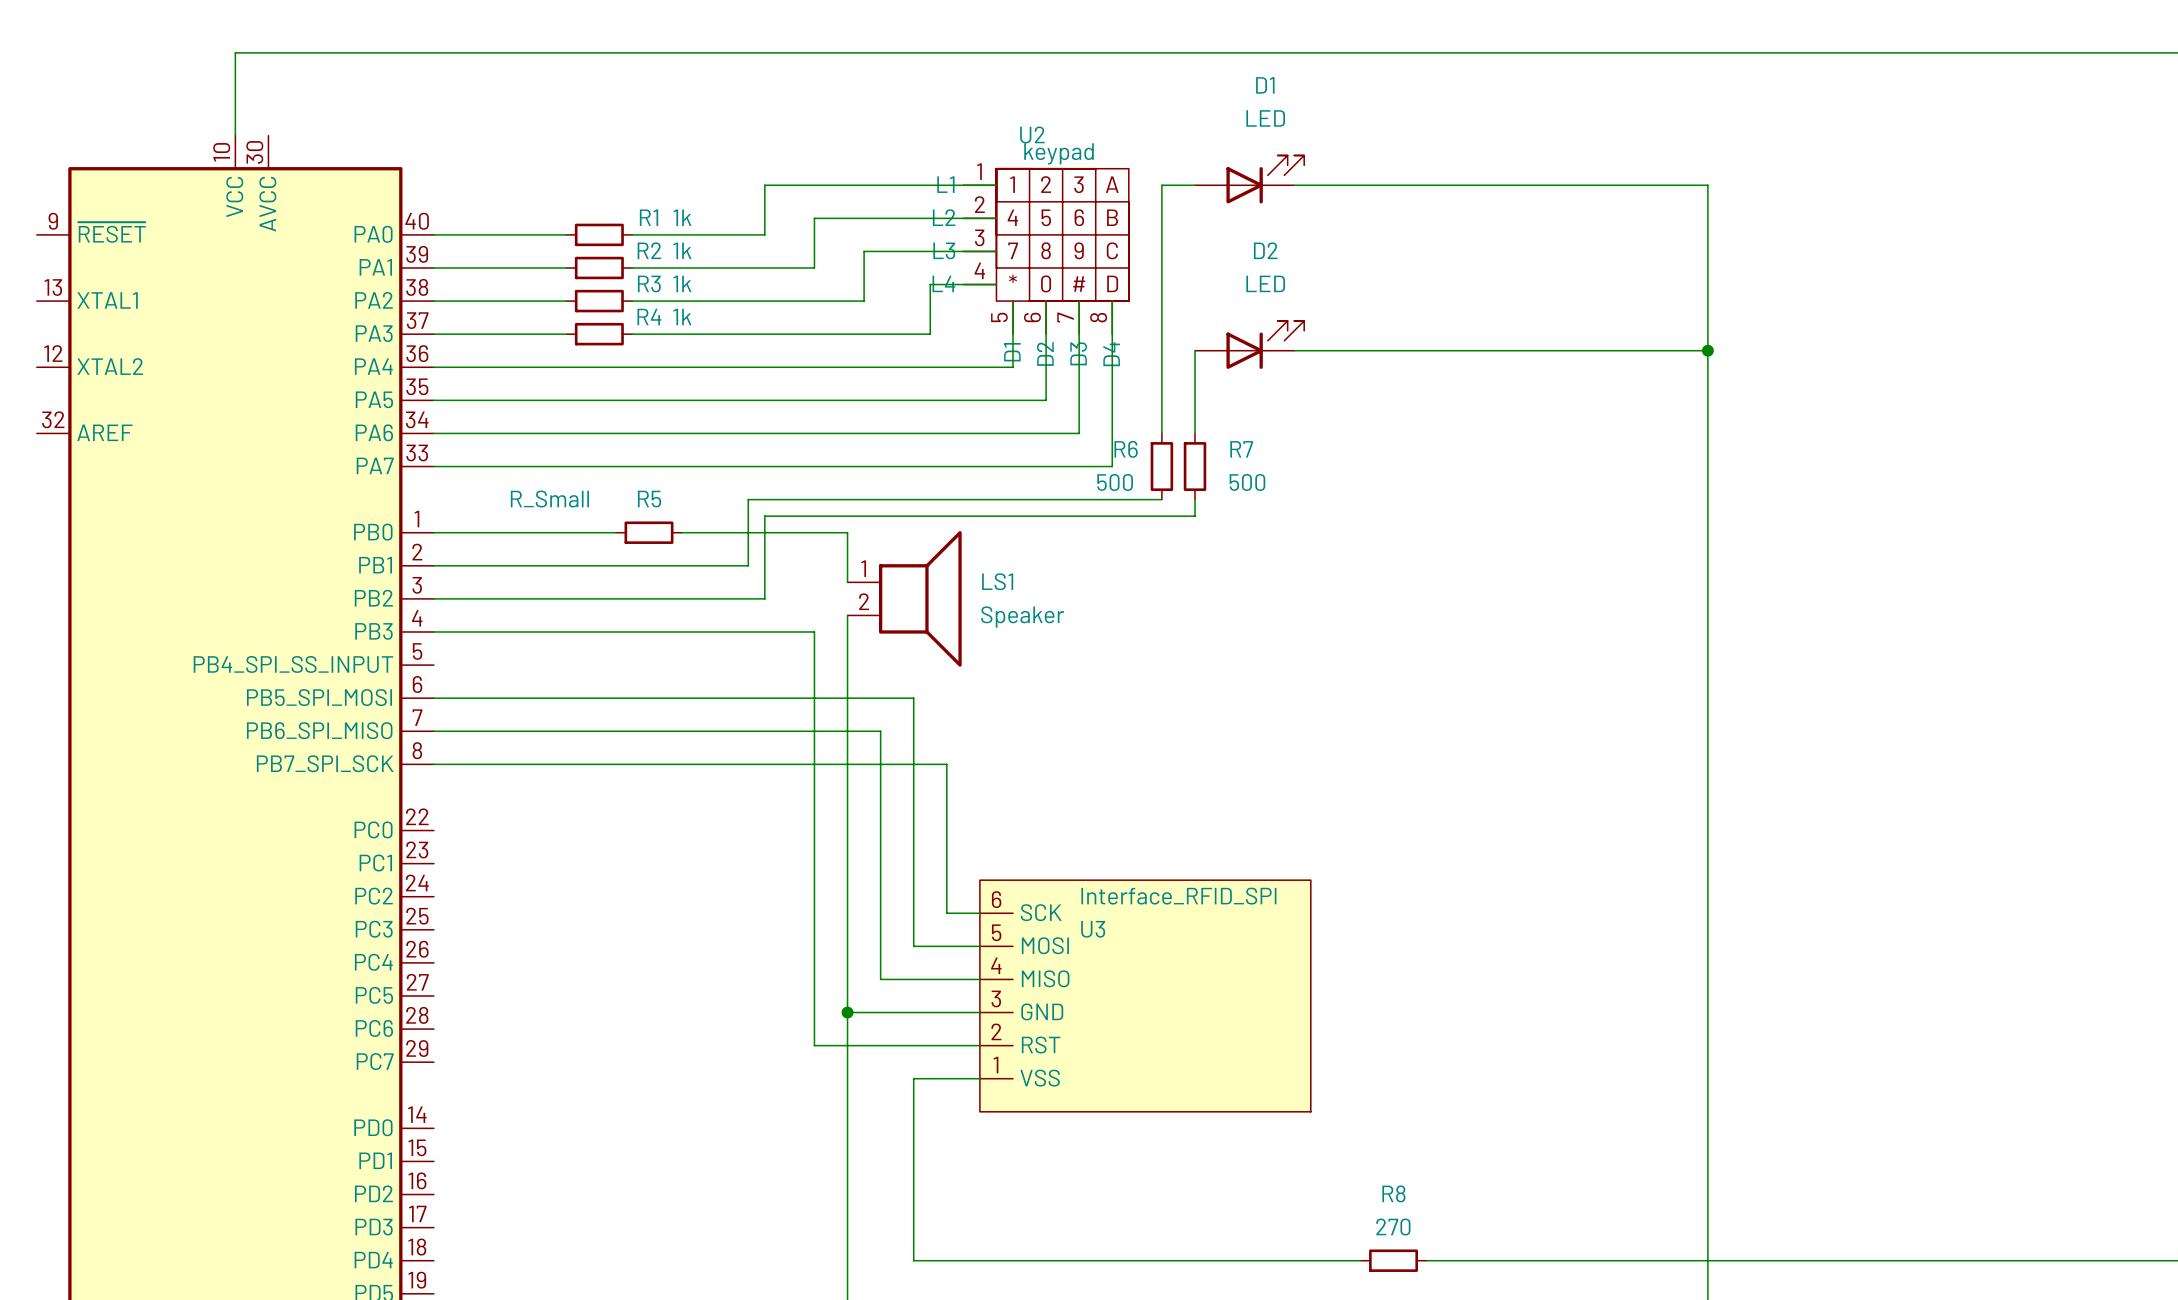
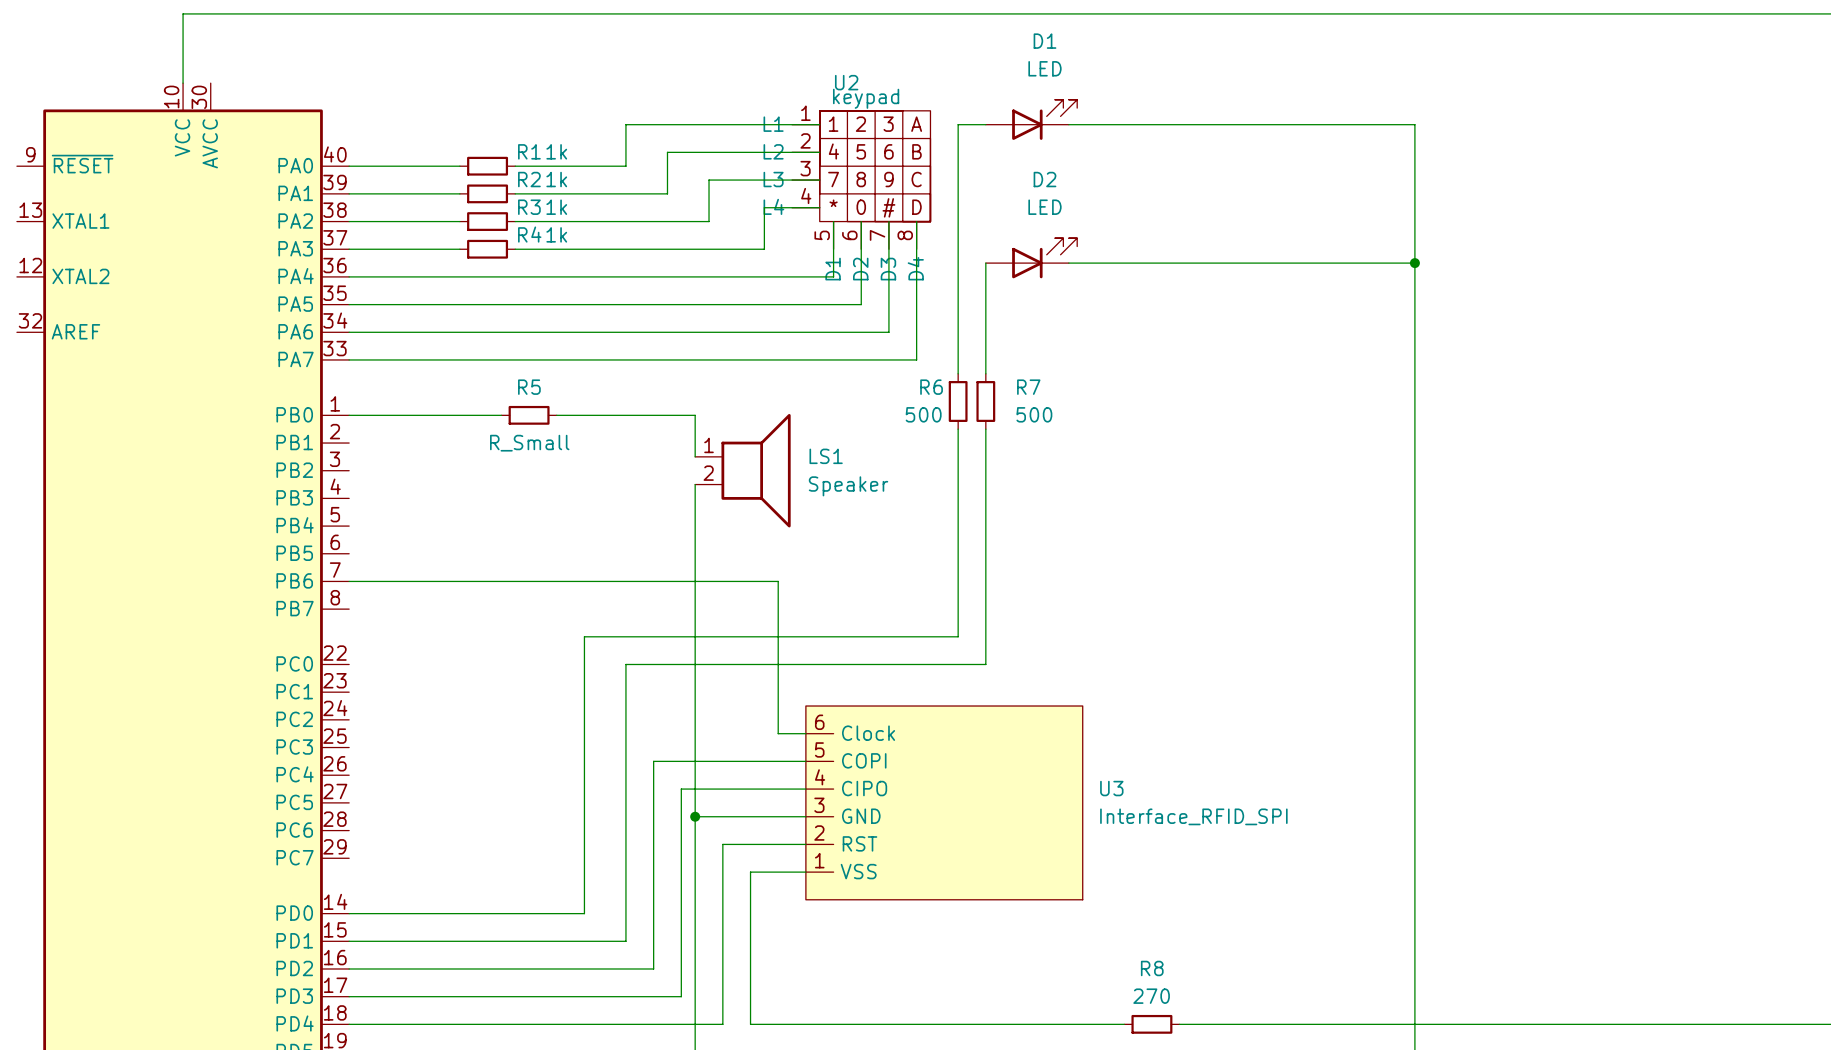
wire: none -> (958, 332) (958, 373)
wire: none -> (985, 332) (985, 373)
R6 position: (1161, 466) -> (958, 401)
R7 position: (1194, 466) -> (985, 401)
R5 value position: R_Small (549, 499) -> R_Small (529, 443)
wire: (1161, 499) (748, 499) (748, 565) (433, 565) -> none
wire: (1194, 499) (1194, 516) (764, 516) (764, 598) (433, 598) -> none
wire: none -> (958, 429) (958, 636) (584, 636) (584, 913) (349, 913)
wire: none -> (985, 429) (985, 664) (625, 664) (625, 941) (349, 941)
wire: (433, 631) (814, 631) (814, 1045) (880, 1045) -> (349, 1024) (722, 1024) (722, 844)
part pin name: PB4_SPI_SS_INPUT (293, 664) -> PB4 (295, 525)
part pin name: PB5_SPI_MOSI (319, 697) -> PB5 (294, 553)
wire: (433, 698) (913, 698) (913, 946) -> (349, 968) (653, 968) (653, 761) (750, 761)
part pin name: PB6_SPI_MISO (319, 730) -> PB6 (294, 580)
wire: (880, 731) (880, 979) -> (722, 581) (778, 581) (778, 609)
part pin name: PB7_SPI_SCK (325, 763) -> PB7 (295, 608)
wire: (433, 764) (946, 764) -> none
U3 value position: Interface_RFID_SPI (1178, 896) -> Interface_RFID_SPI (1193, 816)
U3 pin name: SCK (1041, 912) -> Clock (868, 733)
U3 name position: U3 (1093, 929) -> U3 (1111, 788)
U3 pin name: MOSI (1045, 945) -> COPI (864, 760)
U3 pin name: MISO (1045, 978) -> CIPO (864, 788)
wire: none -> (722, 789) (681, 789) (681, 996) (349, 996)

